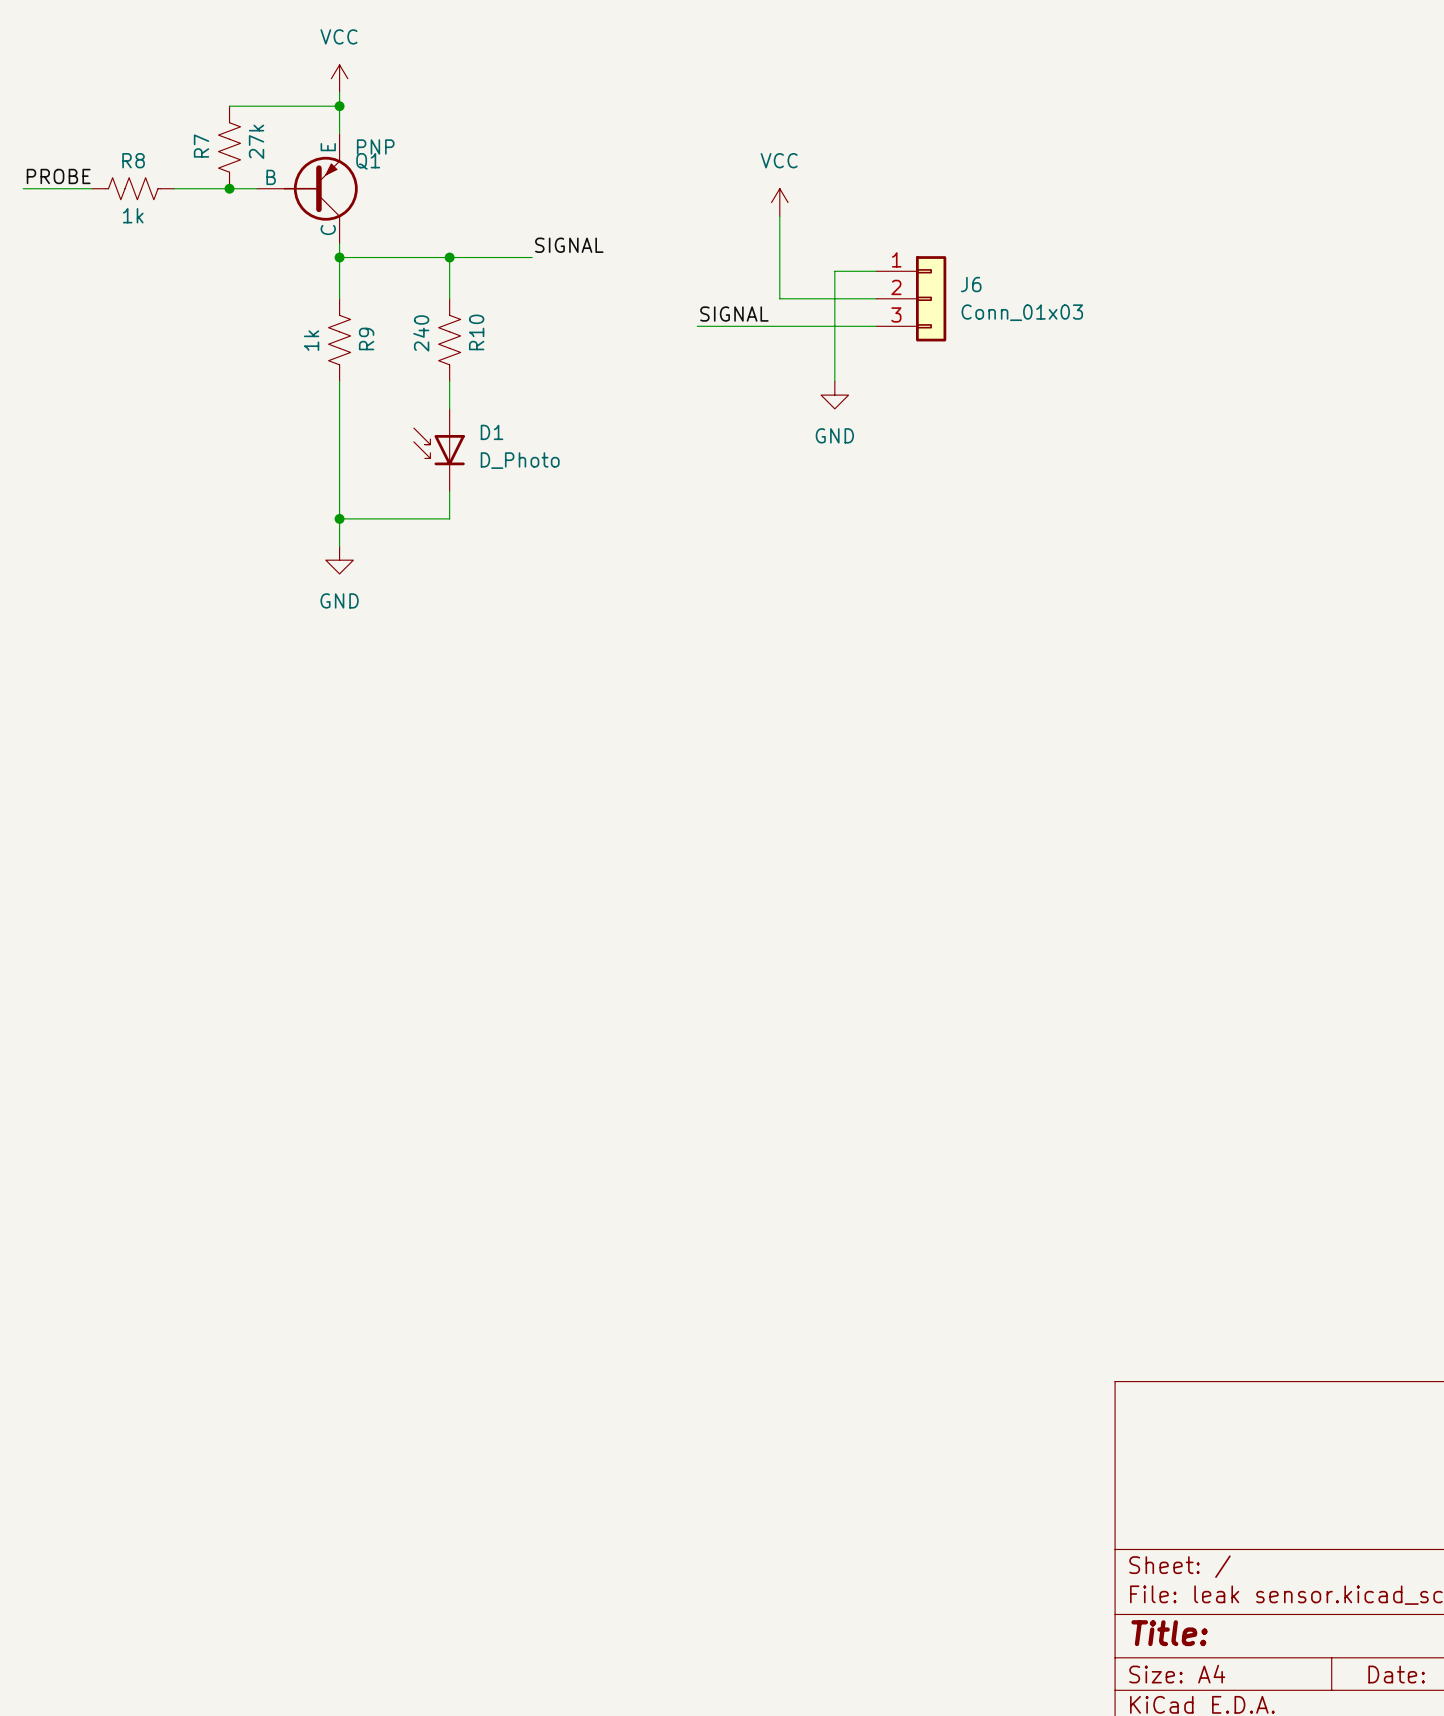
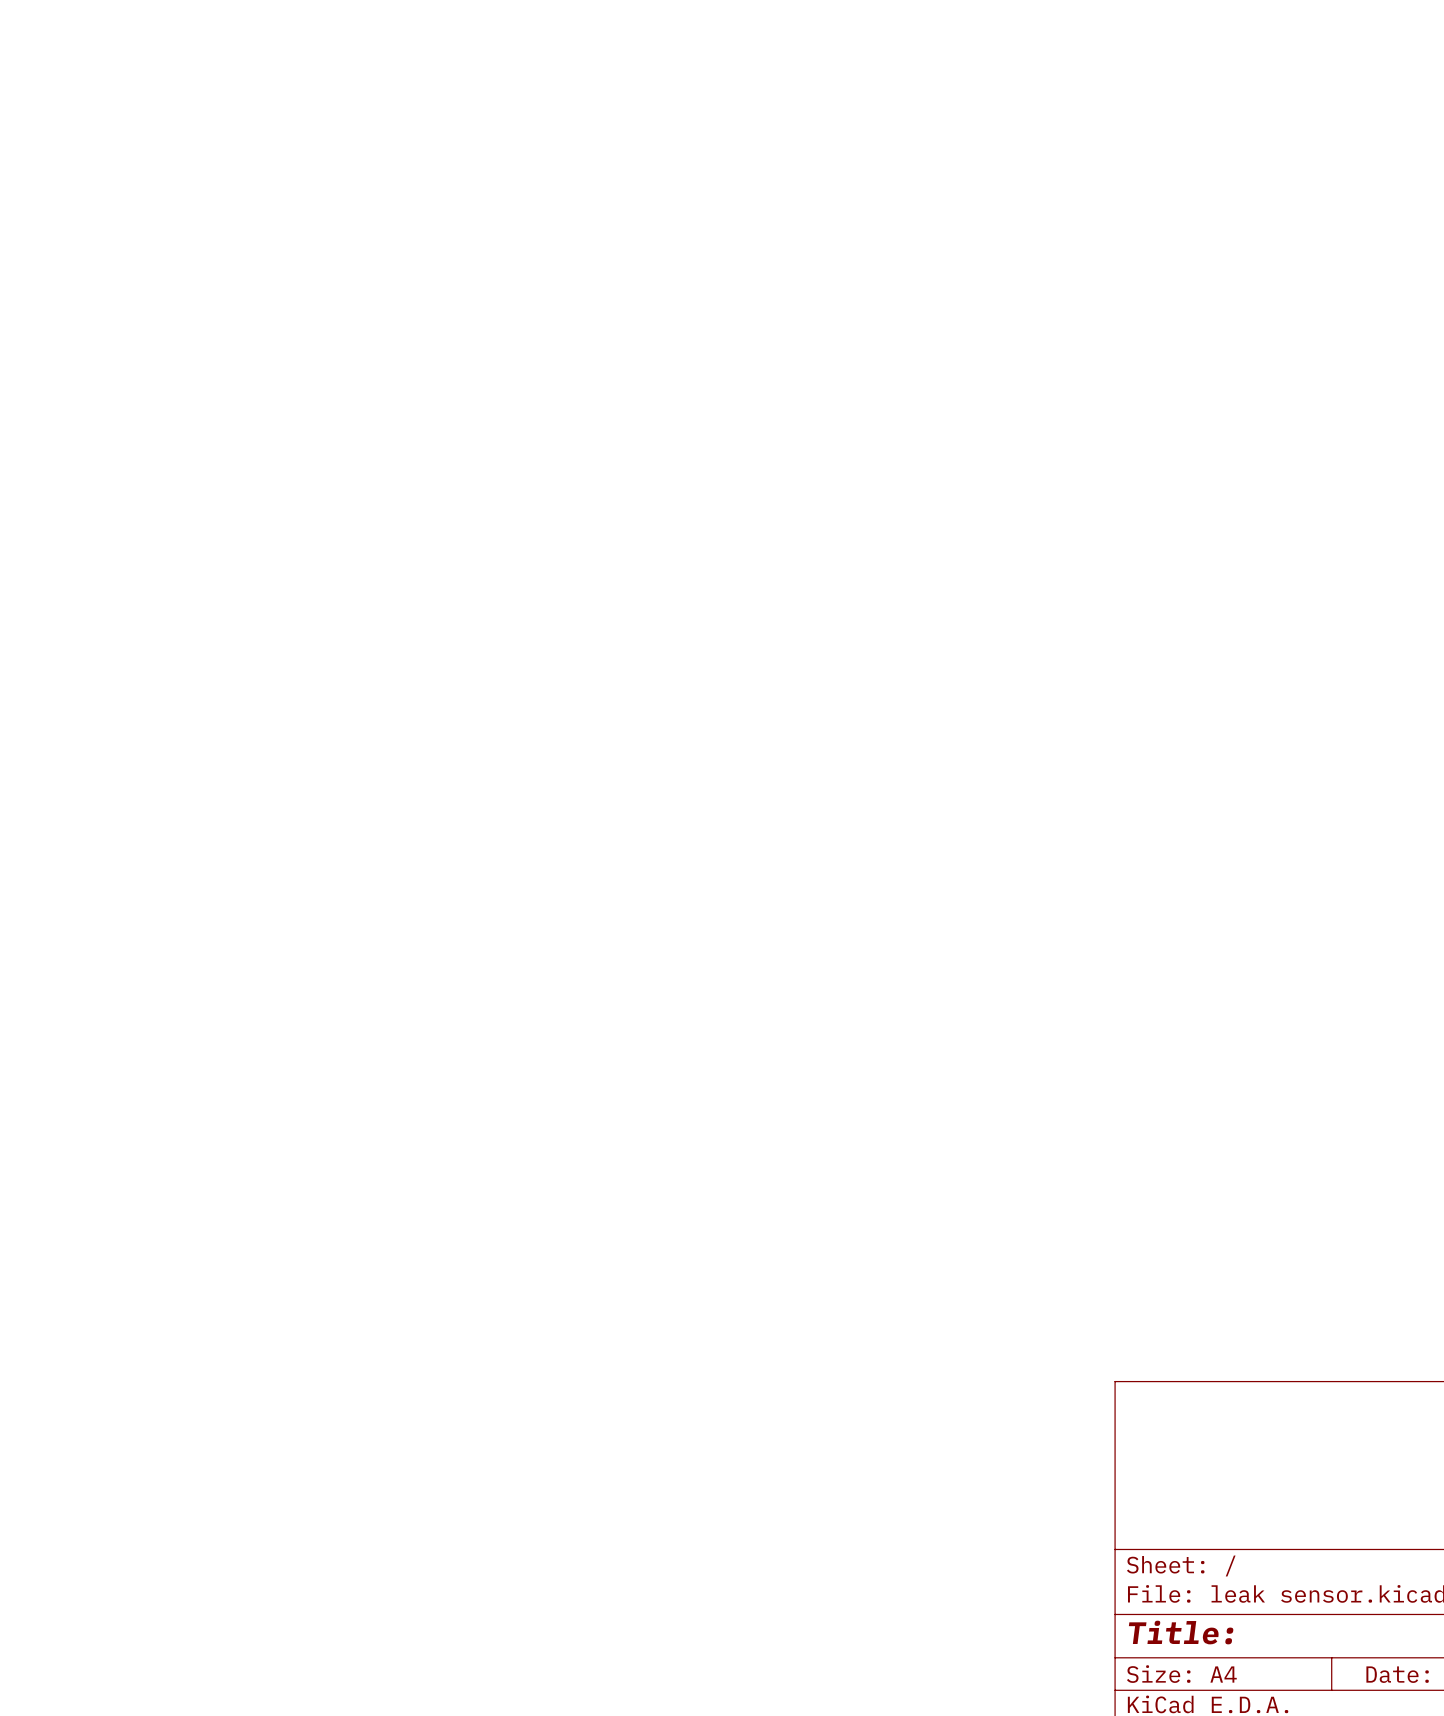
power symbol: VCC (339, 78) -> none
wire: (339, 92) (339, 133) -> none
wire: (229, 106) (339, 106) -> none
junction: (339, 106) -> none
R7: 27k (229, 147) -> none
label: PROBE (58, 176) -> none
wire: (23, 188) (91, 188) -> none
R8: 1k (133, 188) -> none
wire: (174, 188) (257, 188) -> none
junction: (229, 188) -> none
Q1: PNP (307, 188) -> none
power symbol: VCC (779, 202) -> none
wire: (779, 216) (779, 298) (876, 298) -> none
wire: (339, 243) (339, 298) -> none
label: SIGNAL (569, 245) -> none
wire: (339, 257) (532, 257) -> none
junction: (339, 257) -> none
wire: (449, 257) (449, 298) -> none
junction: (449, 257) -> none
wire: (876, 271) (834, 271) (834, 381) -> none
J6: Conn_01x03 (911, 298) -> none
label: SIGNAL (734, 314) -> none
wire: (697, 326) (876, 326) -> none
R9: 1k (339, 340) -> none
R10: 240 (449, 340) -> none
wire: (339, 381) (339, 546) -> none
wire: (449, 381) (449, 408) -> none
power symbol: GND (834, 395) -> none
D1: D_Photo (439, 450) -> none
wire: (449, 491) (449, 518) (339, 518) -> none
junction: (339, 518) -> none
power symbol: GND (339, 560) -> none

